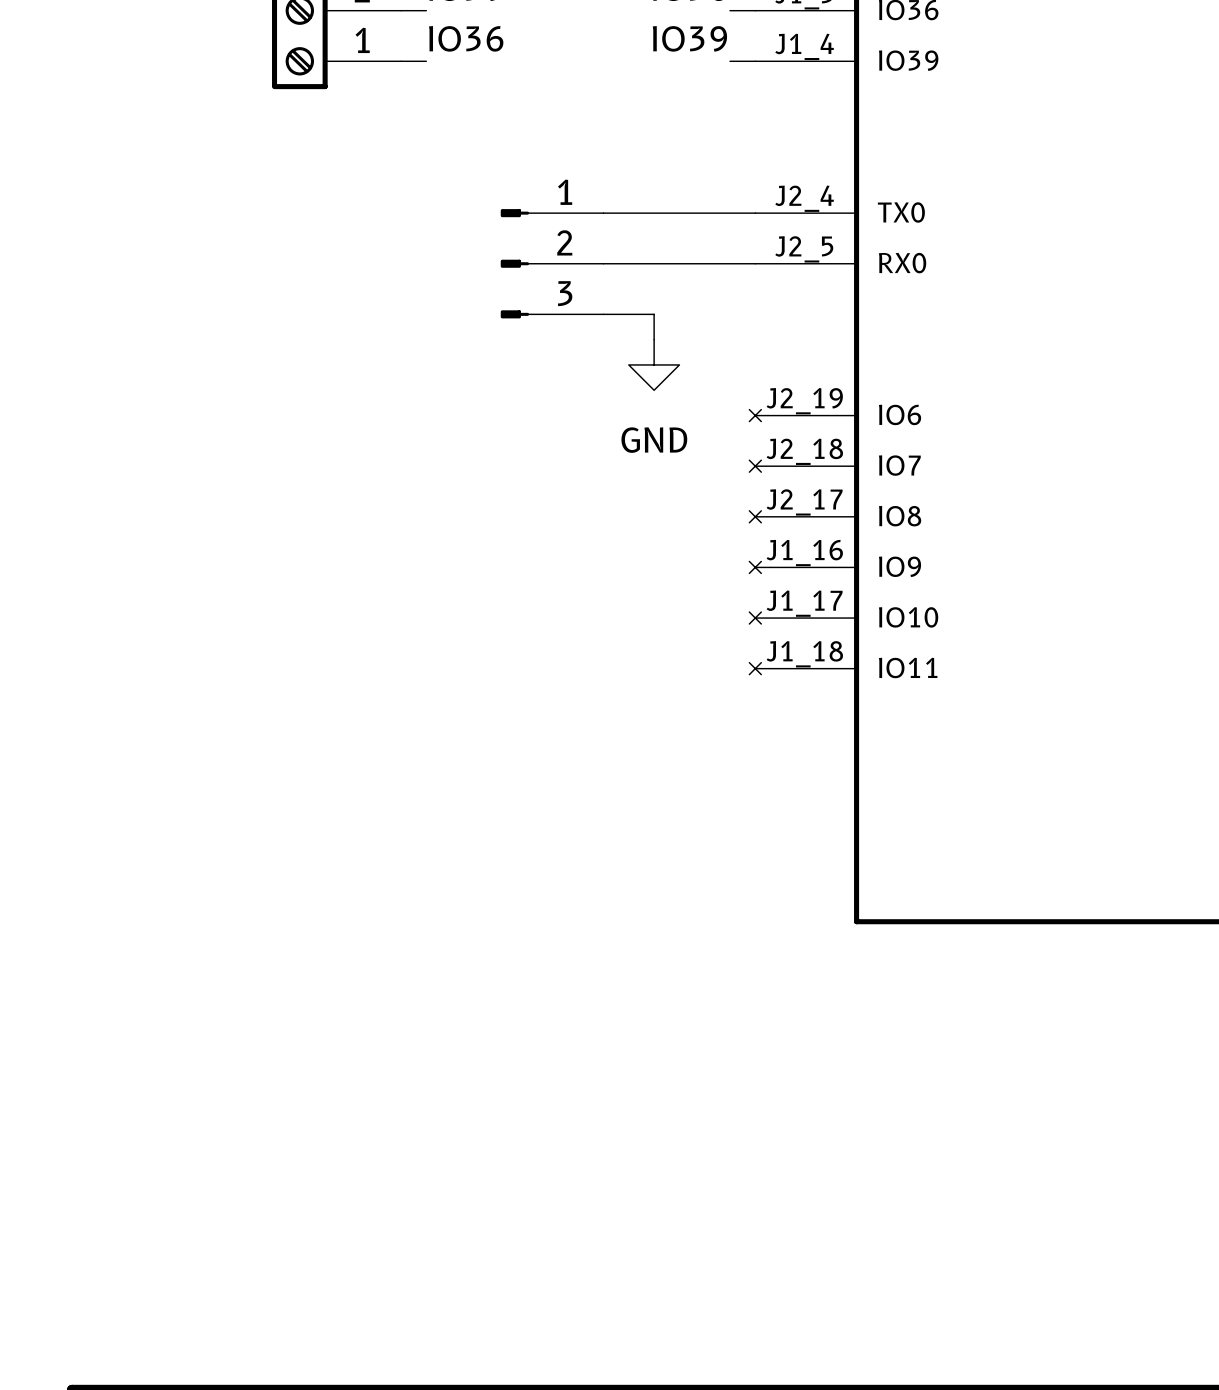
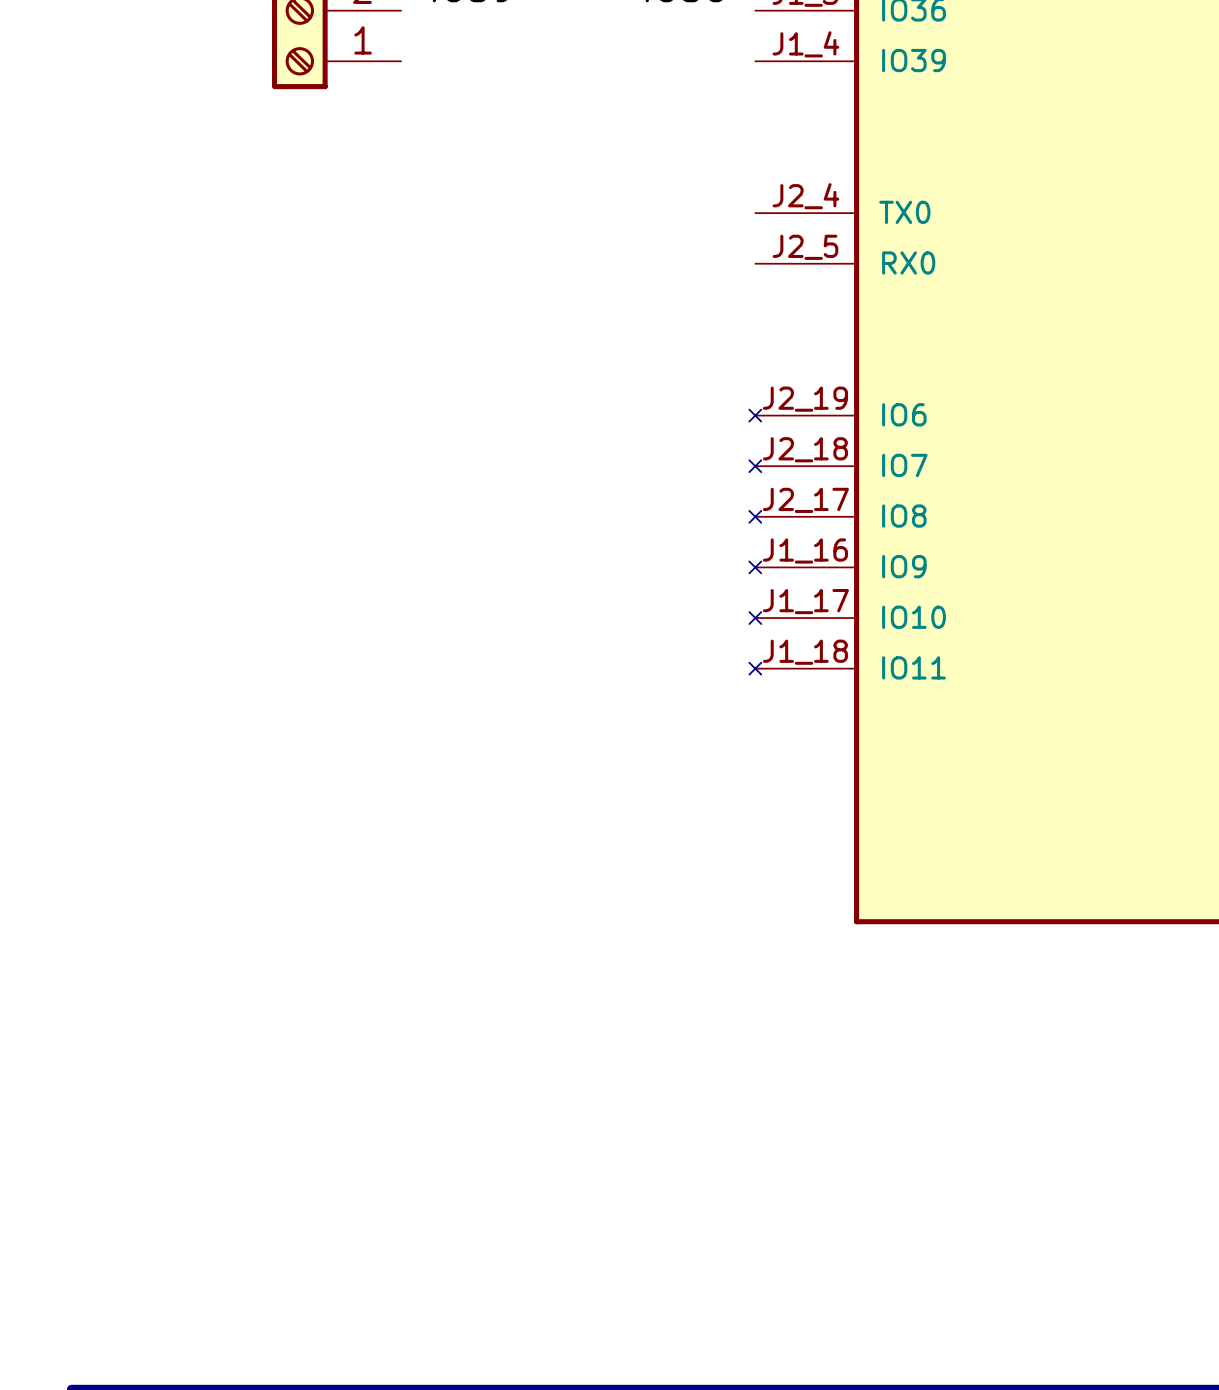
wire: (401, 10) (426, 10) -> none
wire: (730, 10) (755, 10) -> none
label: IO36 (466, 38) -> none
label: IO39 (689, 38) -> none
wire: (401, 61) (426, 61) -> none
wire: (730, 61) (755, 61) -> none
wire: (603, 213) (755, 213) -> none
part: (552, 263) -> none
wire: (603, 263) (755, 263) -> none
wire: (603, 314) (654, 314) (654, 339) -> none
power symbol: GND (654, 364) -> none

